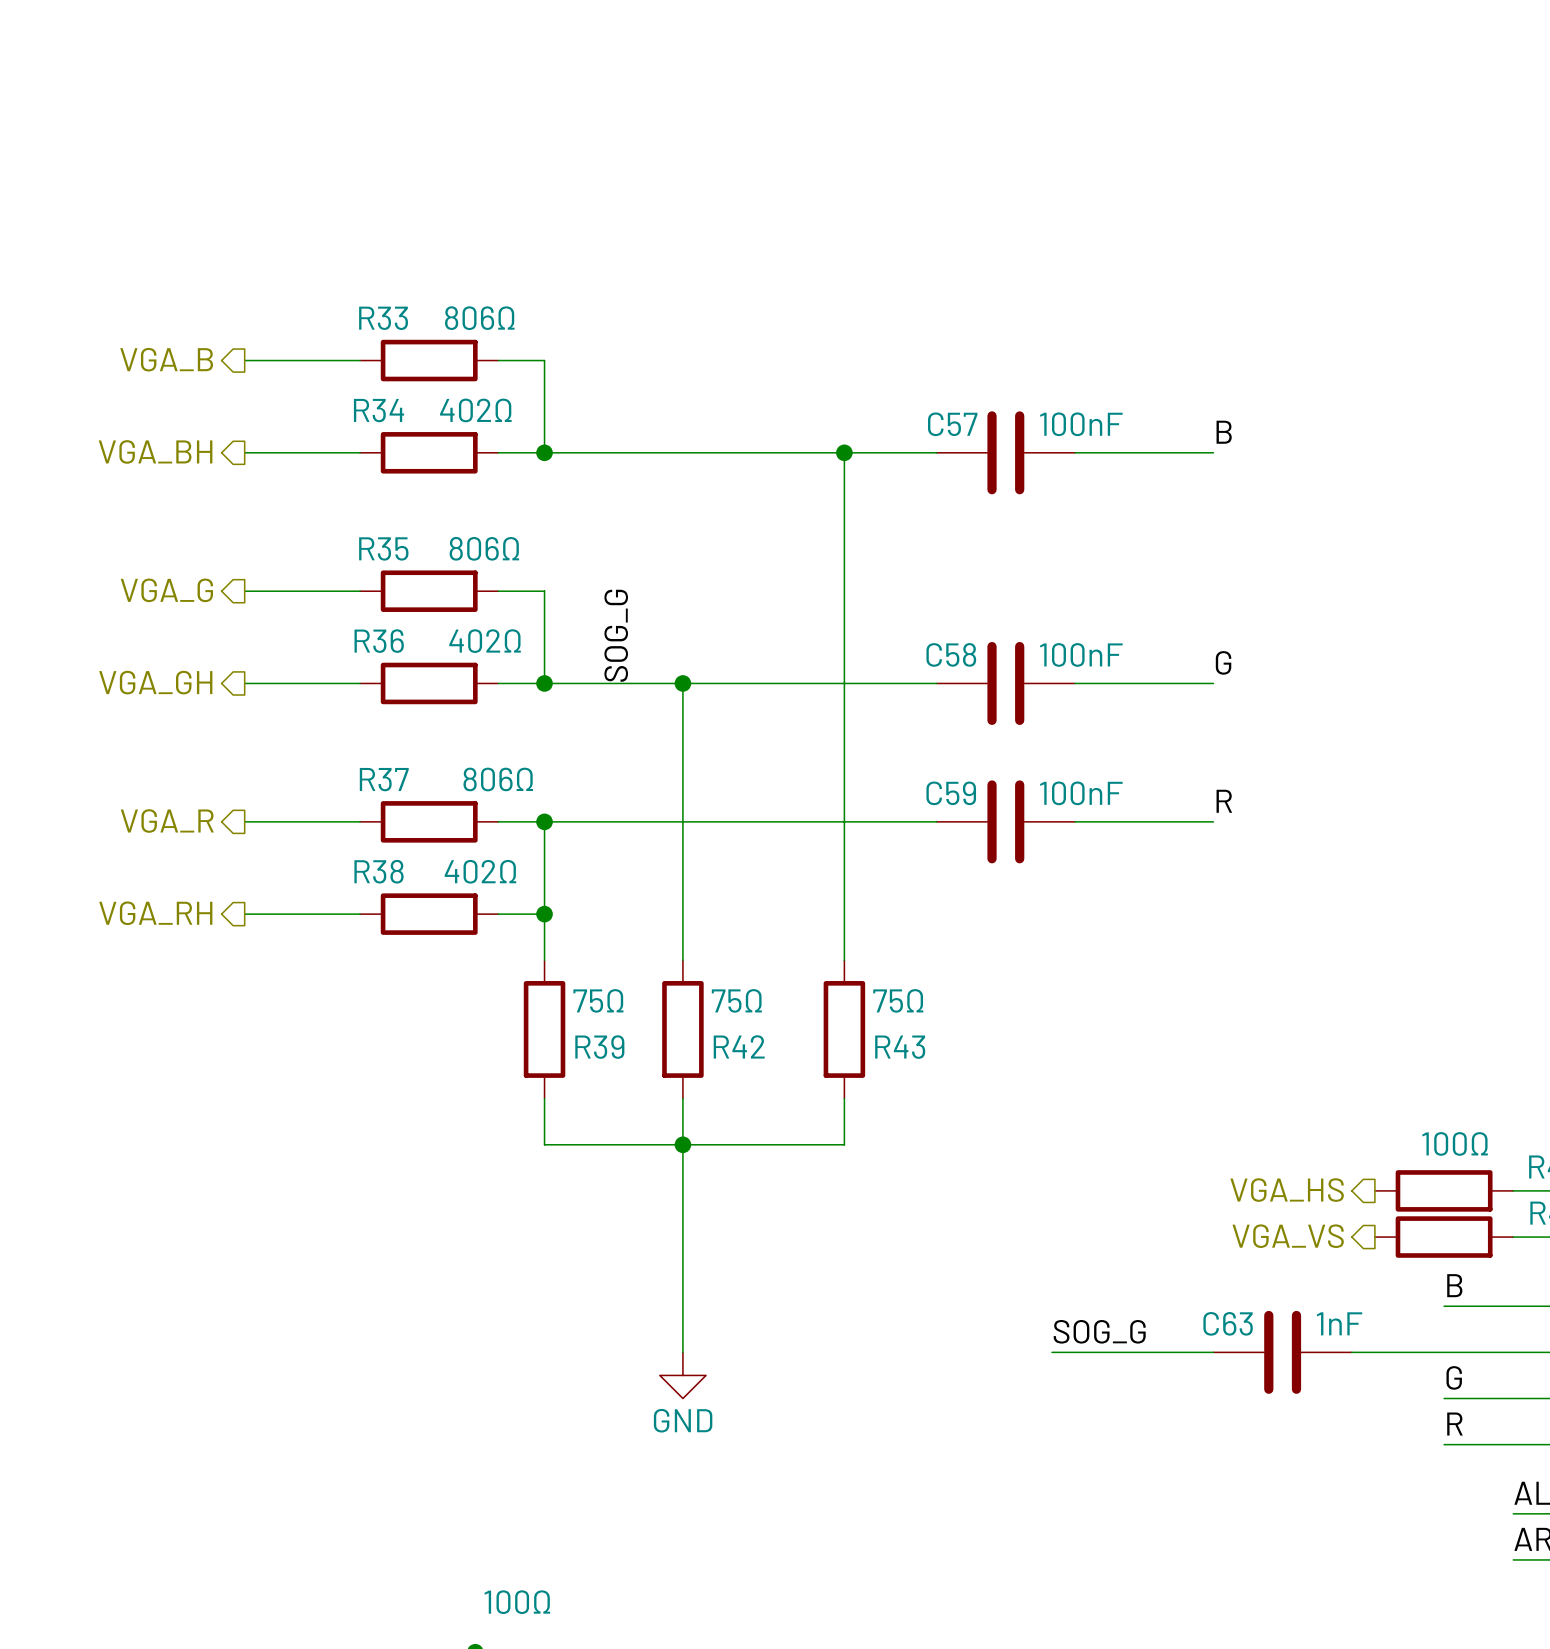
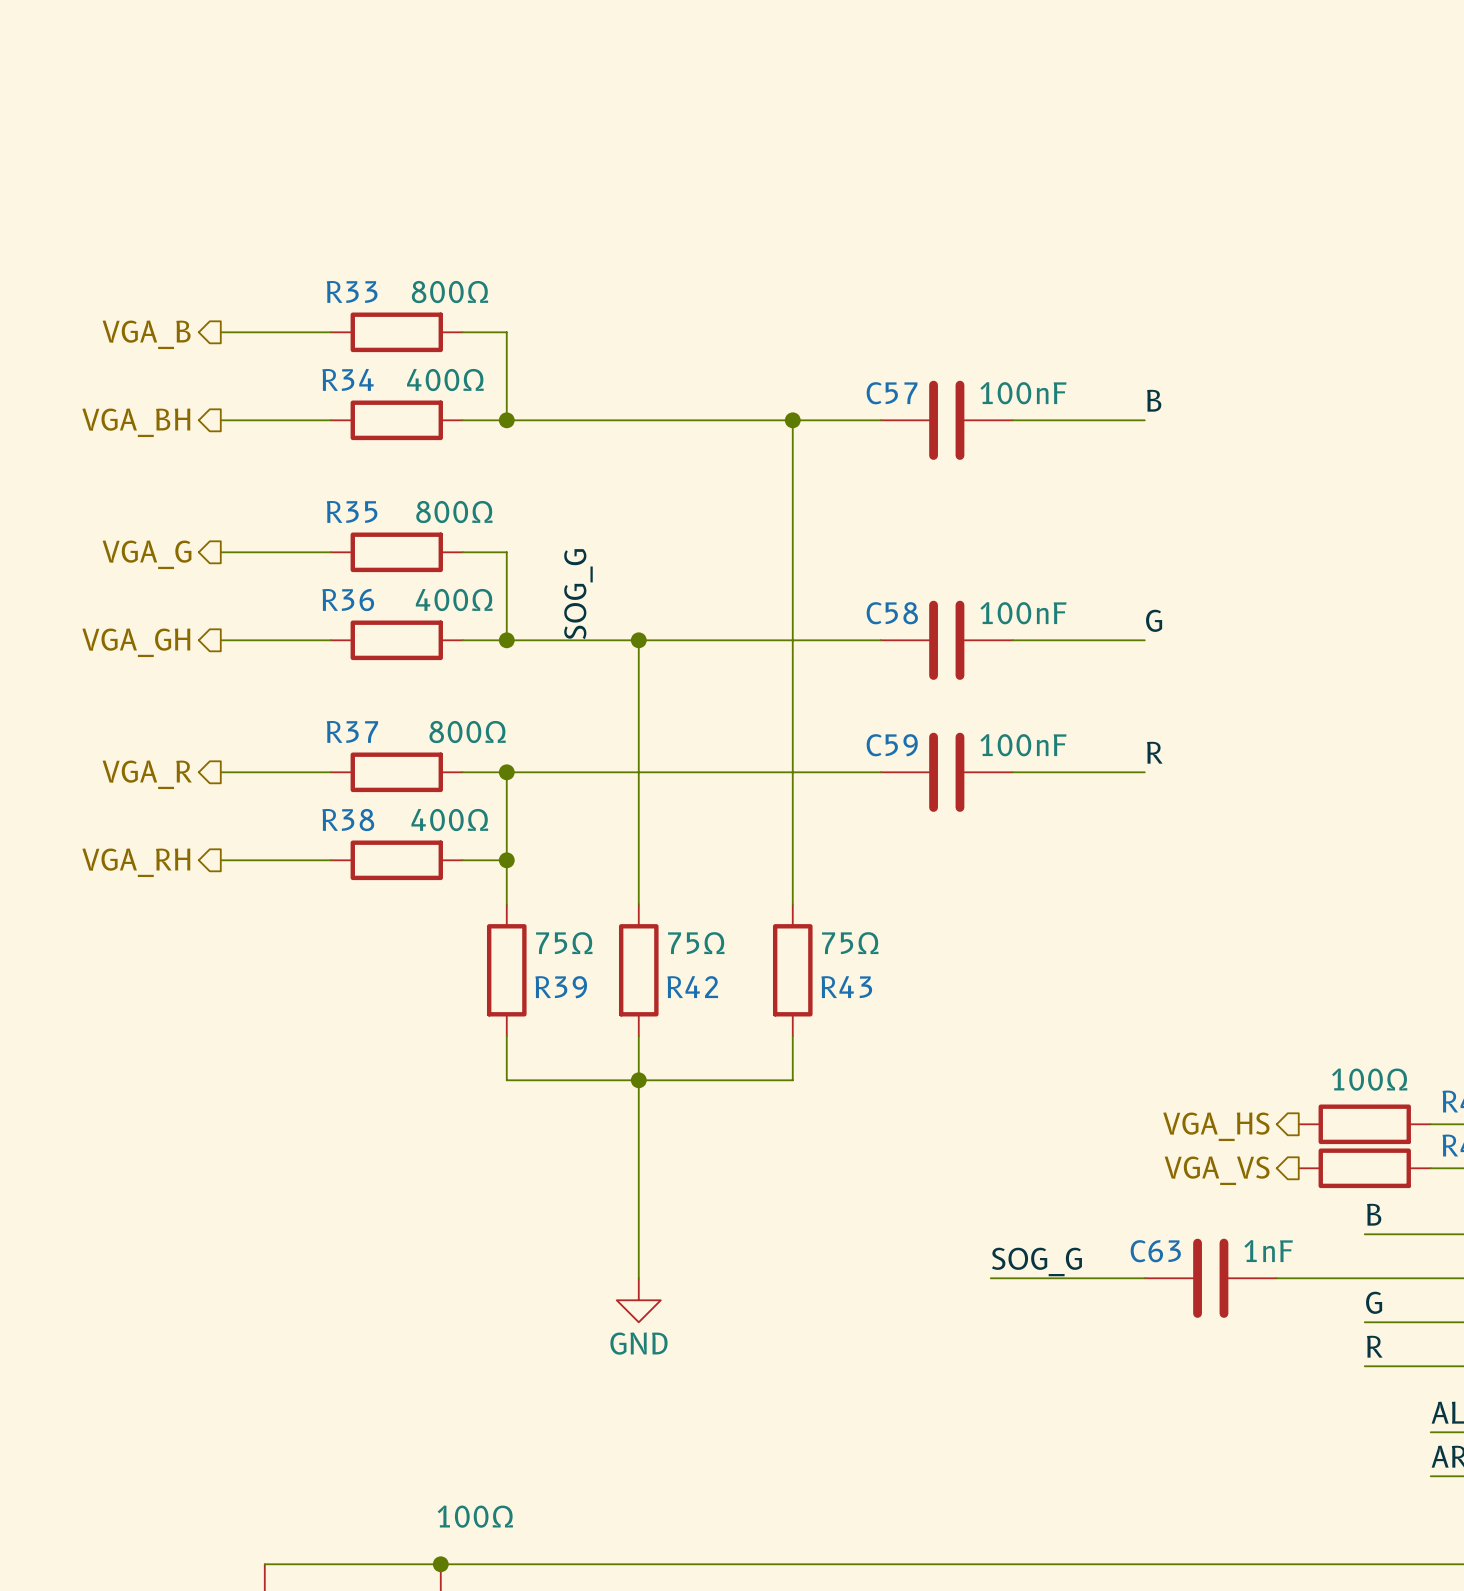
R33 value: 806Ω (479, 318) -> 800Ω (449, 292)
R34 value: 402Ω (475, 410) -> 400Ω (445, 380)
R35 value: 806Ω (484, 548) -> 800Ω (454, 512)
R36 value: 402Ω (485, 641) -> 400Ω (454, 600)
R37 value: 806Ω (498, 779) -> 800Ω (467, 732)
R38 value: 402Ω (480, 871) -> 400Ω (449, 820)

